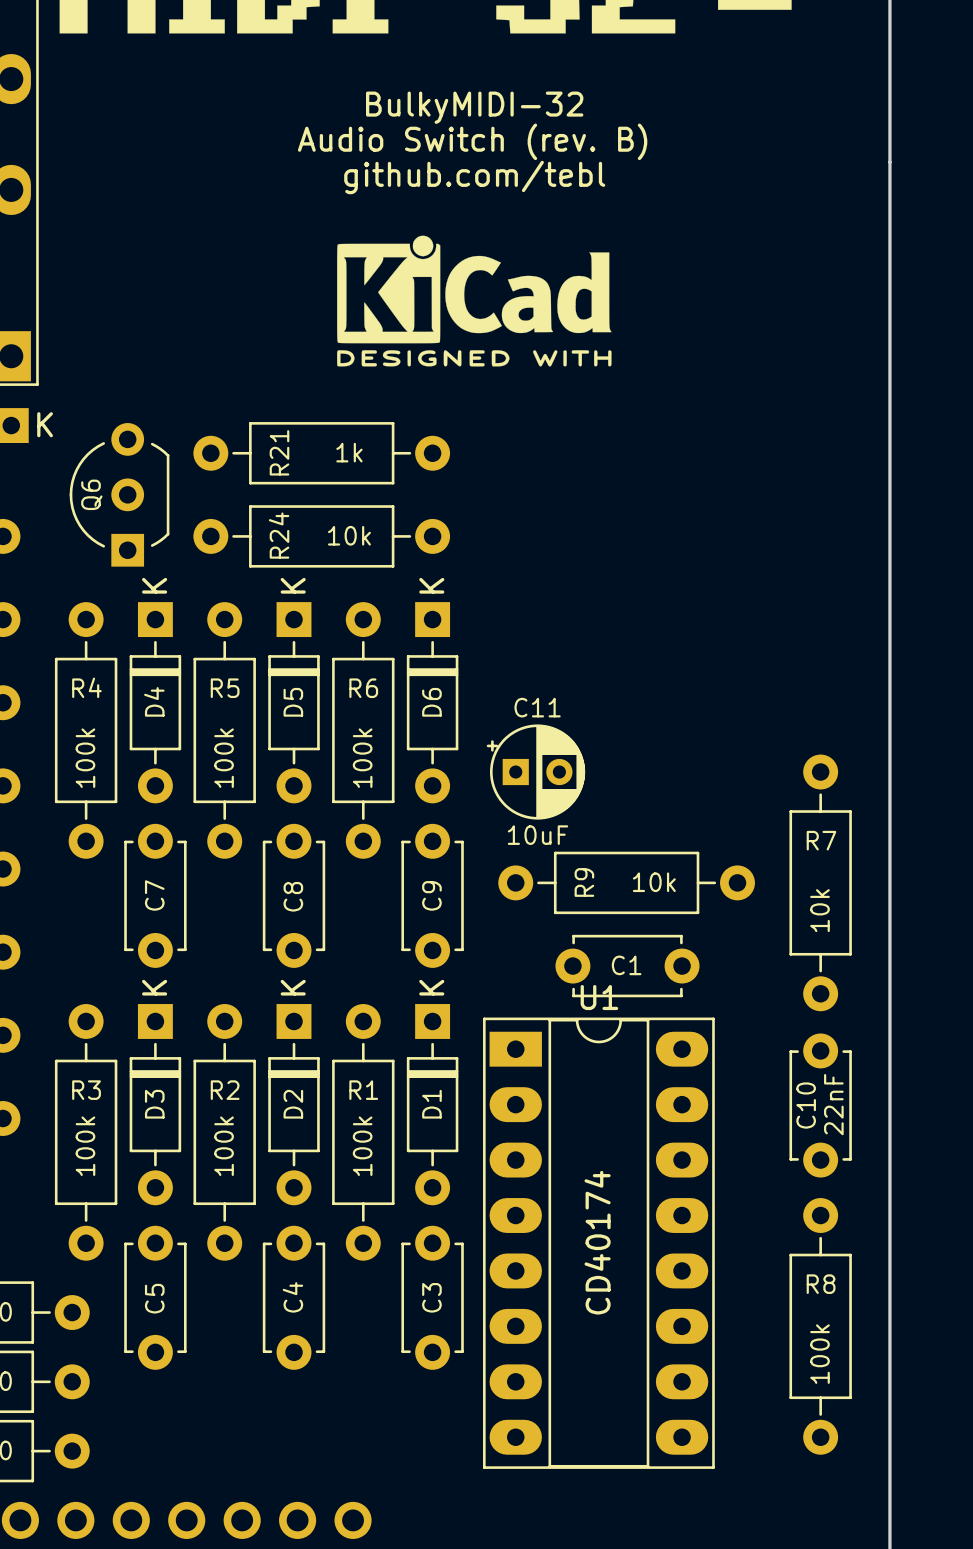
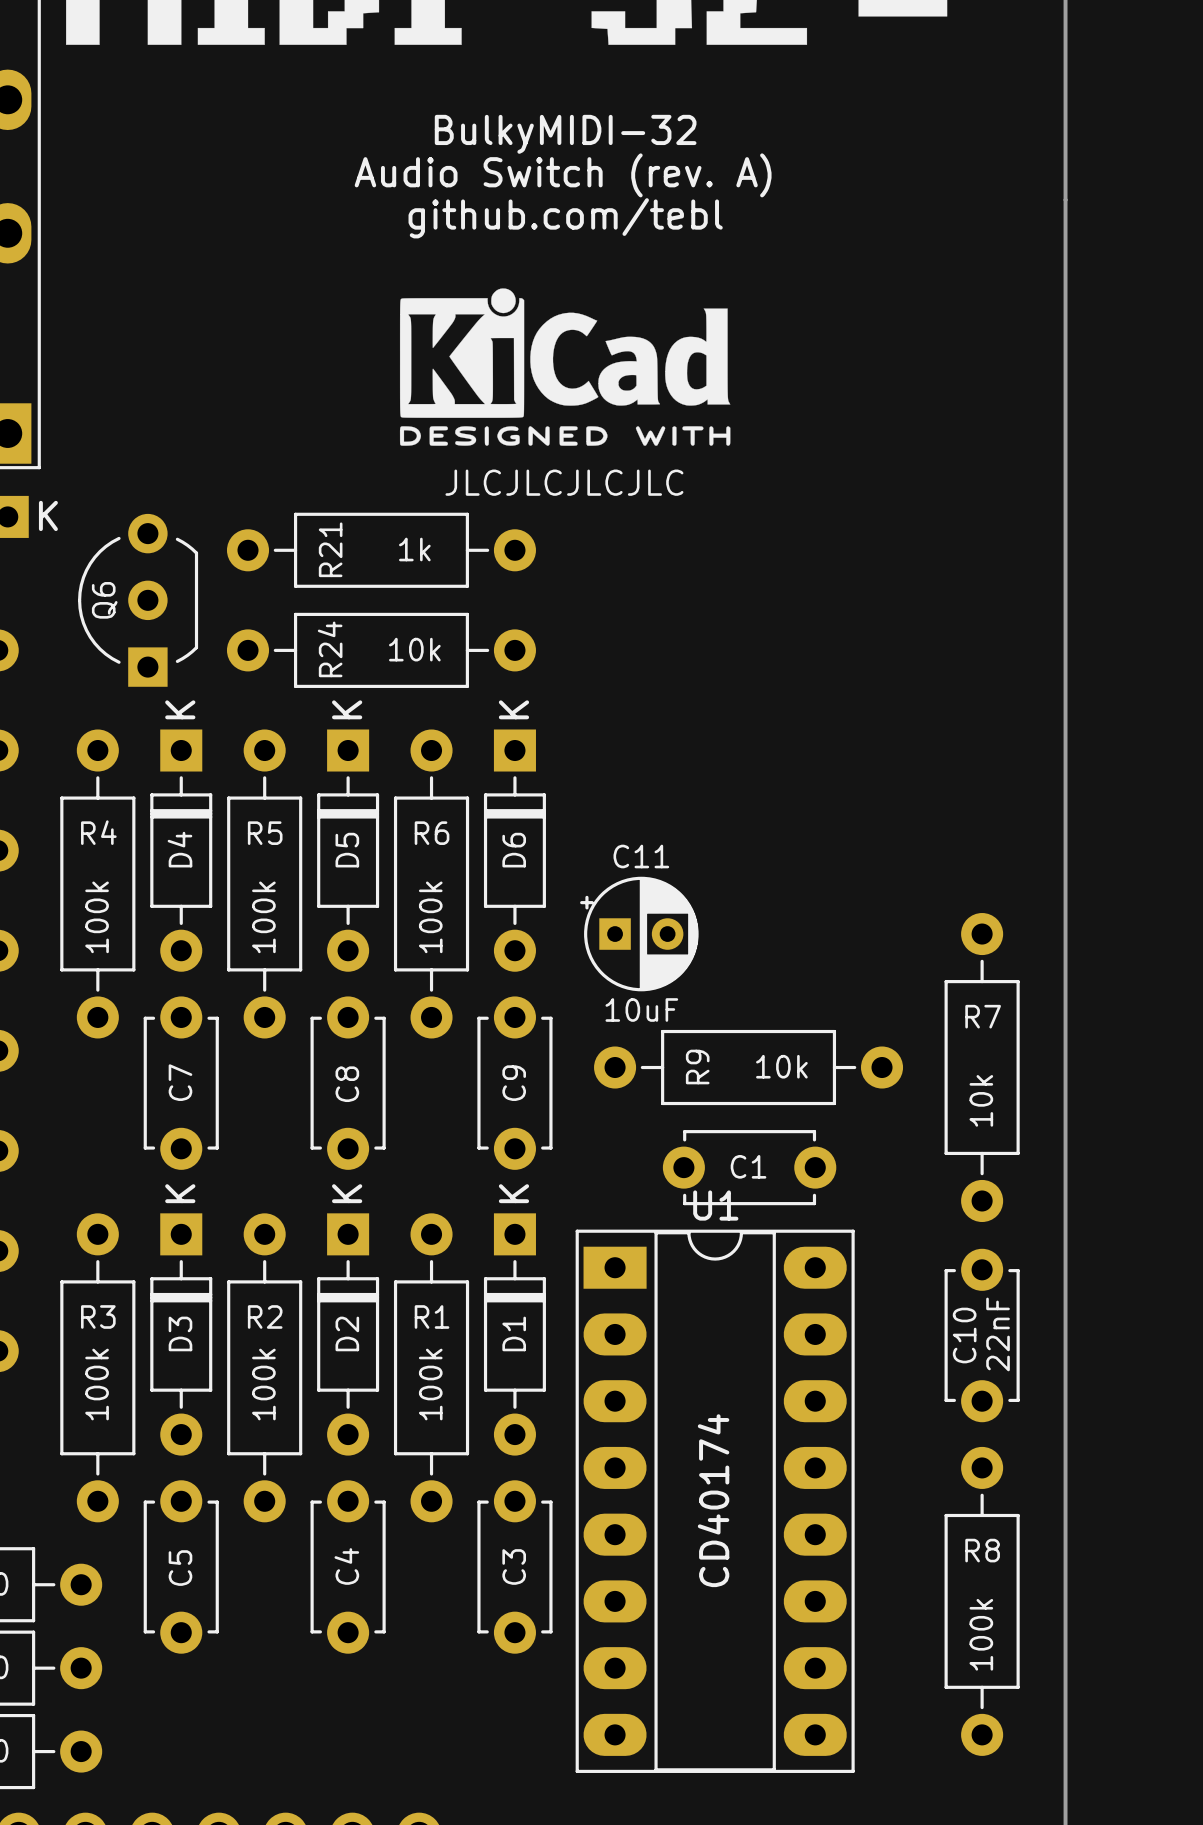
text: Audio Switch (rev. B) (472, 141) -> Audio Switch (rev. A) (563, 175)
text: none -> JLCJLCJLCJLC (564, 482)

